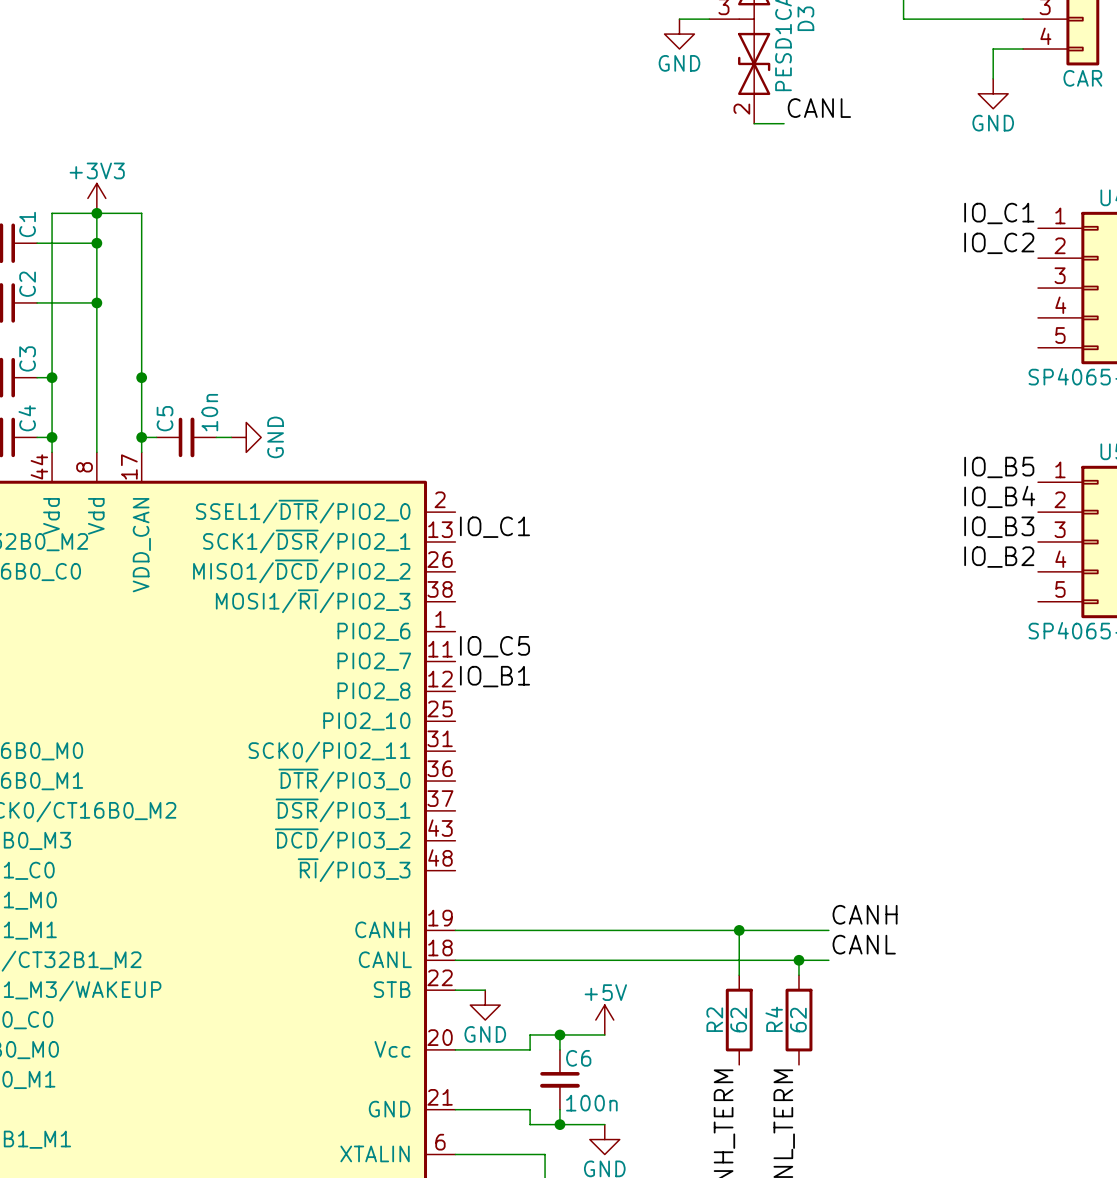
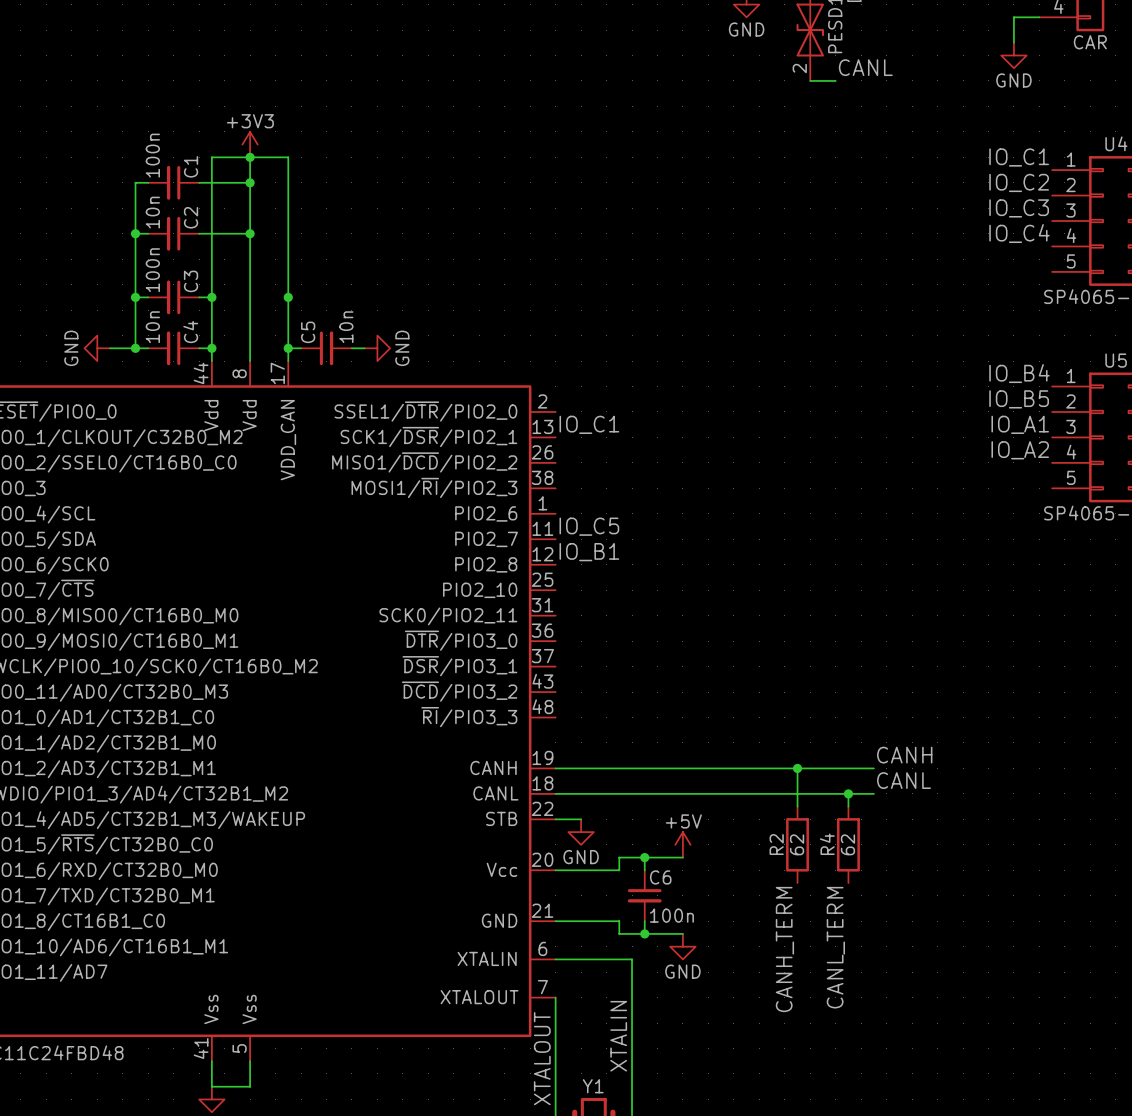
label: none -> IO_C3 (1019, 208)
label: none -> IO_C4 (1019, 233)
label: IO_B5 (999, 467) -> IO_B4 (1019, 373)
label: IO_B4 (999, 496) -> IO_B5 (1019, 399)
label: IO_B3 (999, 527) -> IO_A1 (1020, 424)
label: IO_B2 (999, 557) -> IO_A2 (1020, 450)

